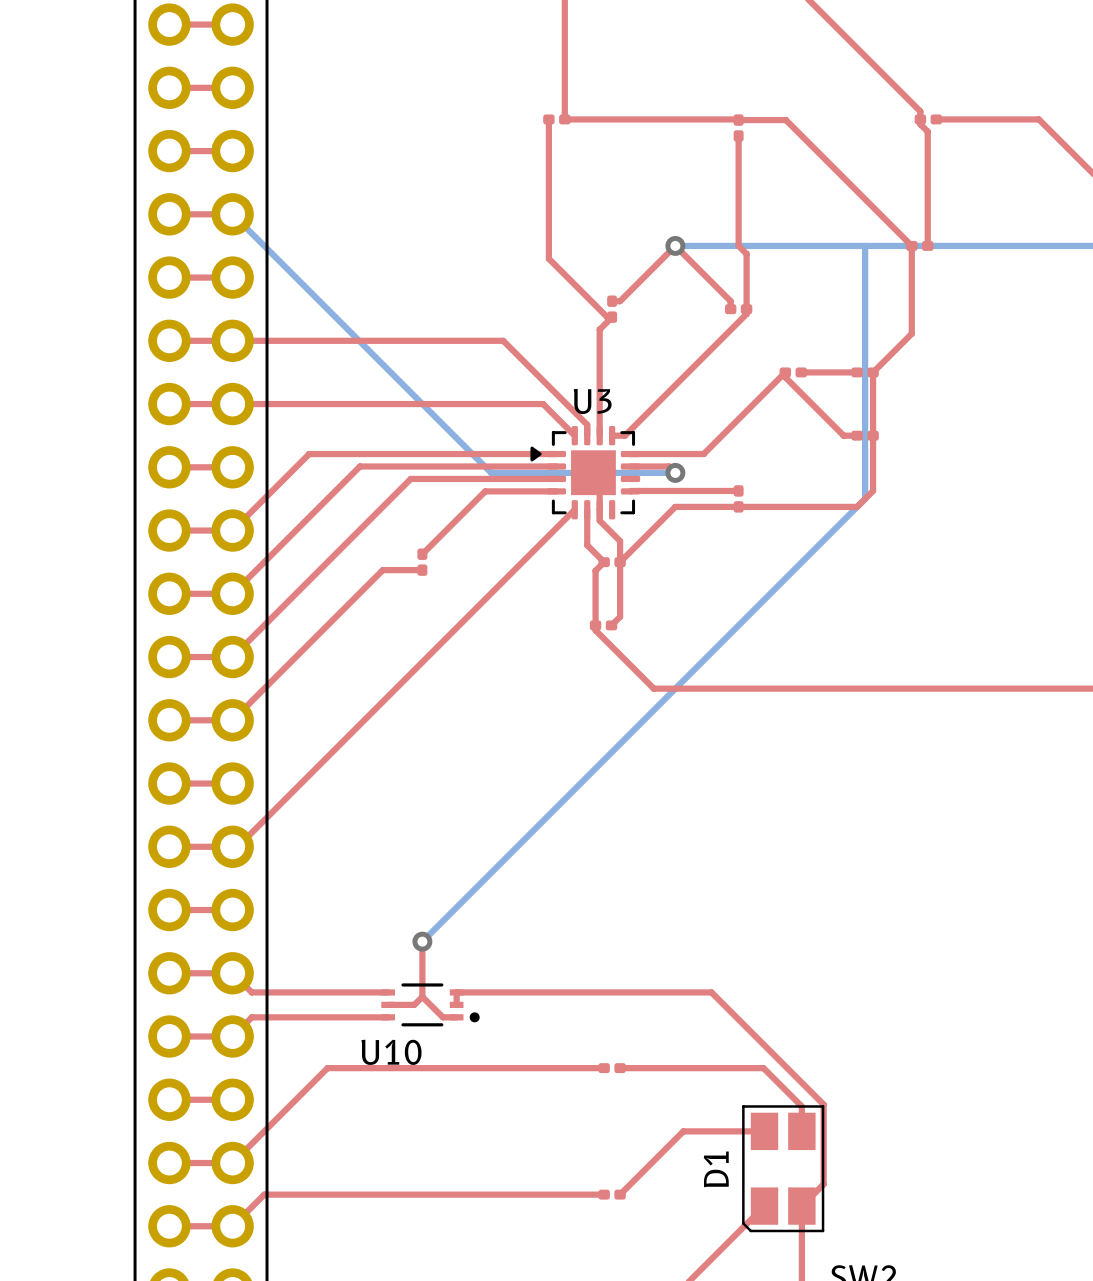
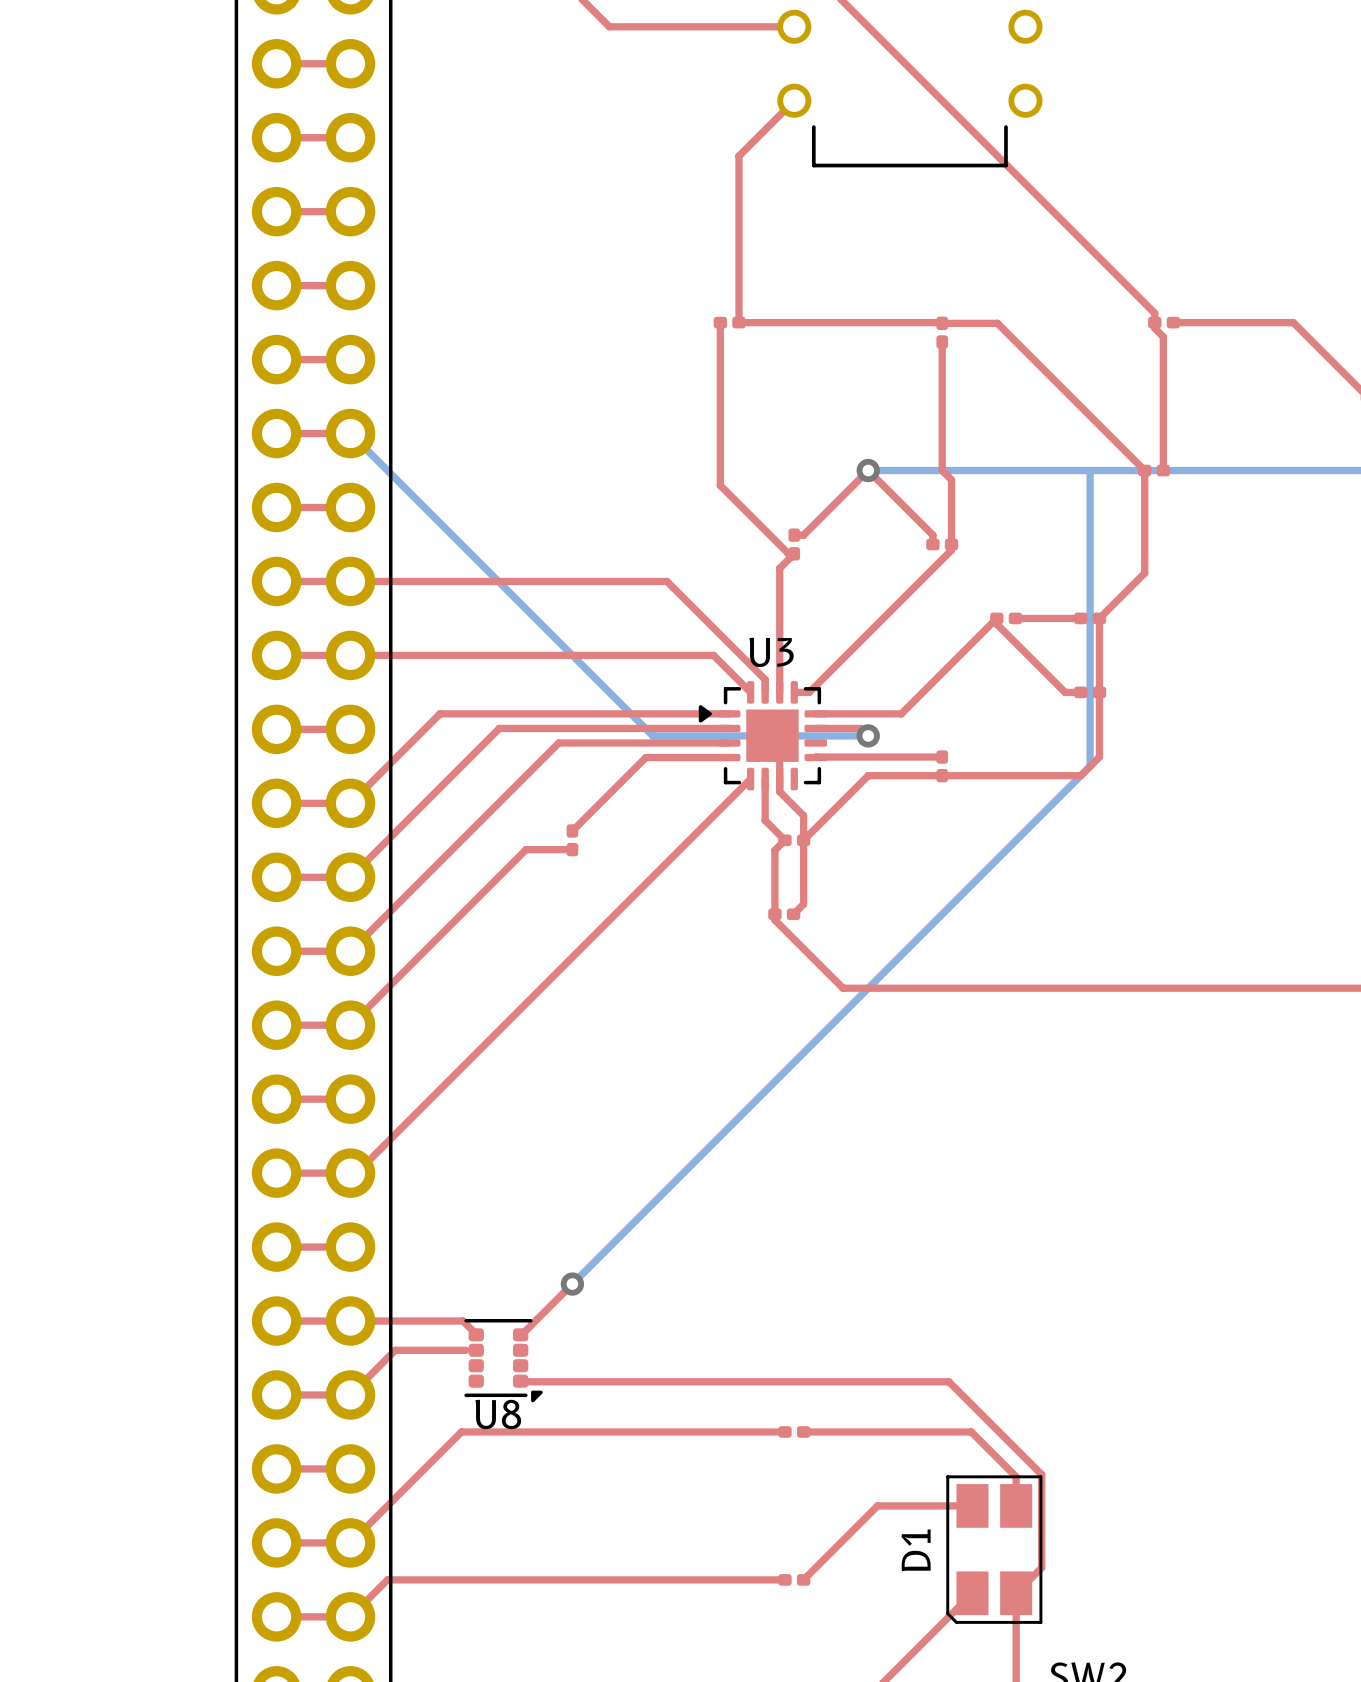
top track: (422, 941) (422, 996) -> (572, 1284) (520, 1334)
top track: (232, 973) (251, 992) (388, 992) -> (350, 1321) (463, 1321) (476, 1334)
top track: (422, 996) (414, 1004) (388, 1004) -> none
top track: (422, 996) (442, 1017) (456, 1017) -> none
U10: (430, 1004) -> none
top track: (456, 1004) (456, 992) (711, 992) (744, 1025) -> (520, 1381) (948, 1381)
U8: none -> (503, 1360)
top track: (251, 1017) (388, 1017) -> (372, 1372) (395, 1350) (465, 1350)

